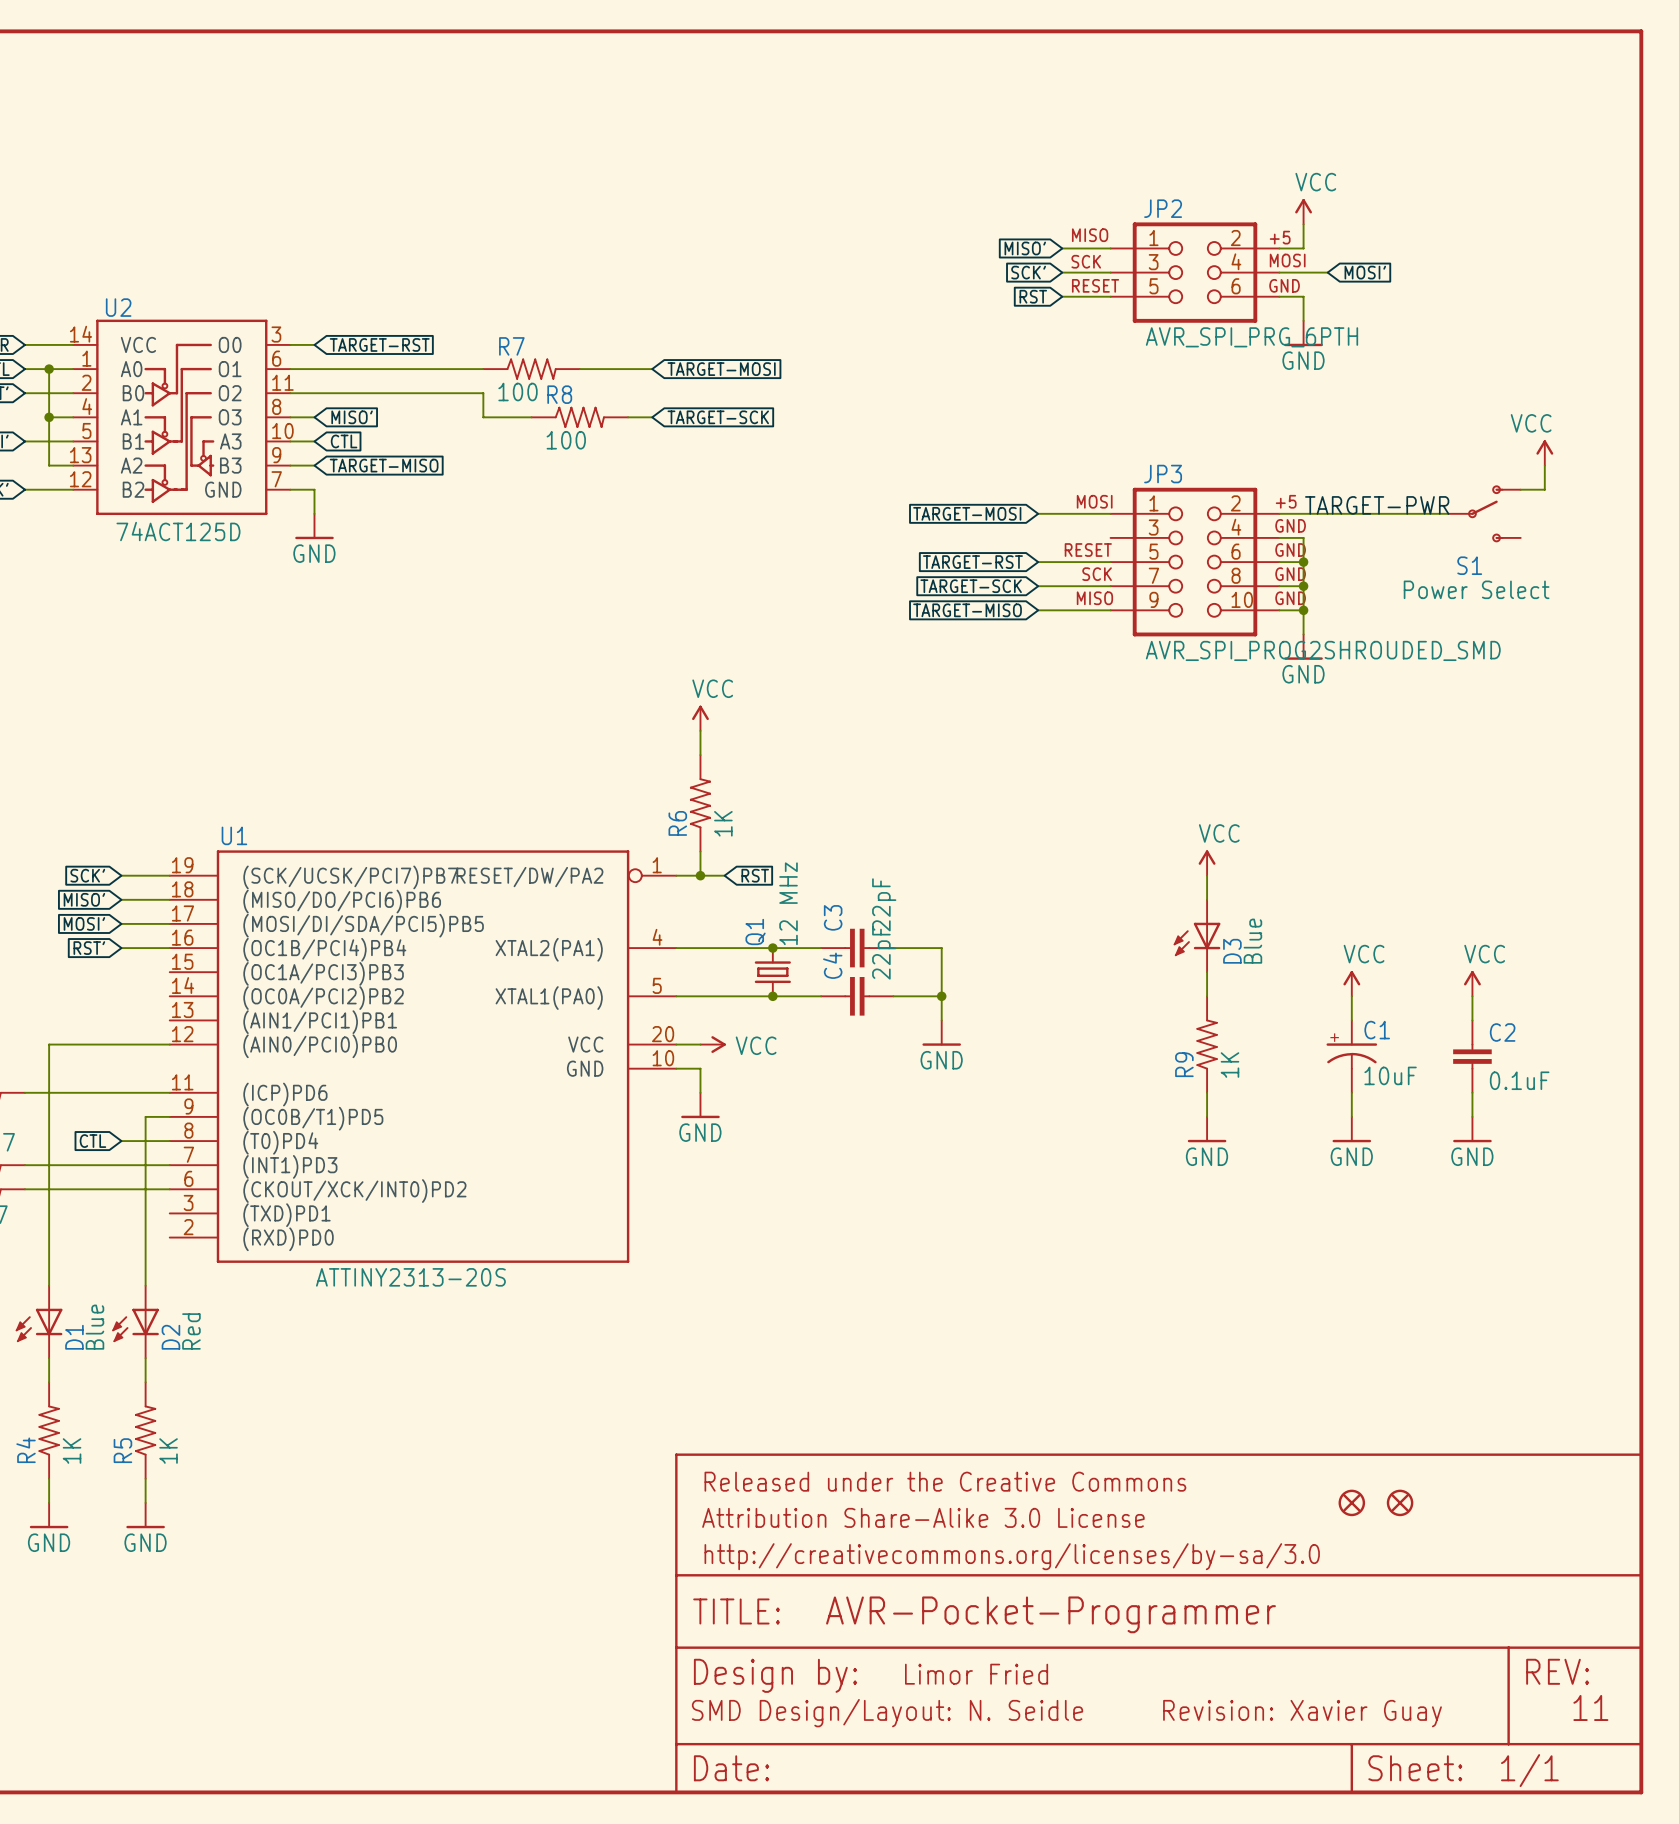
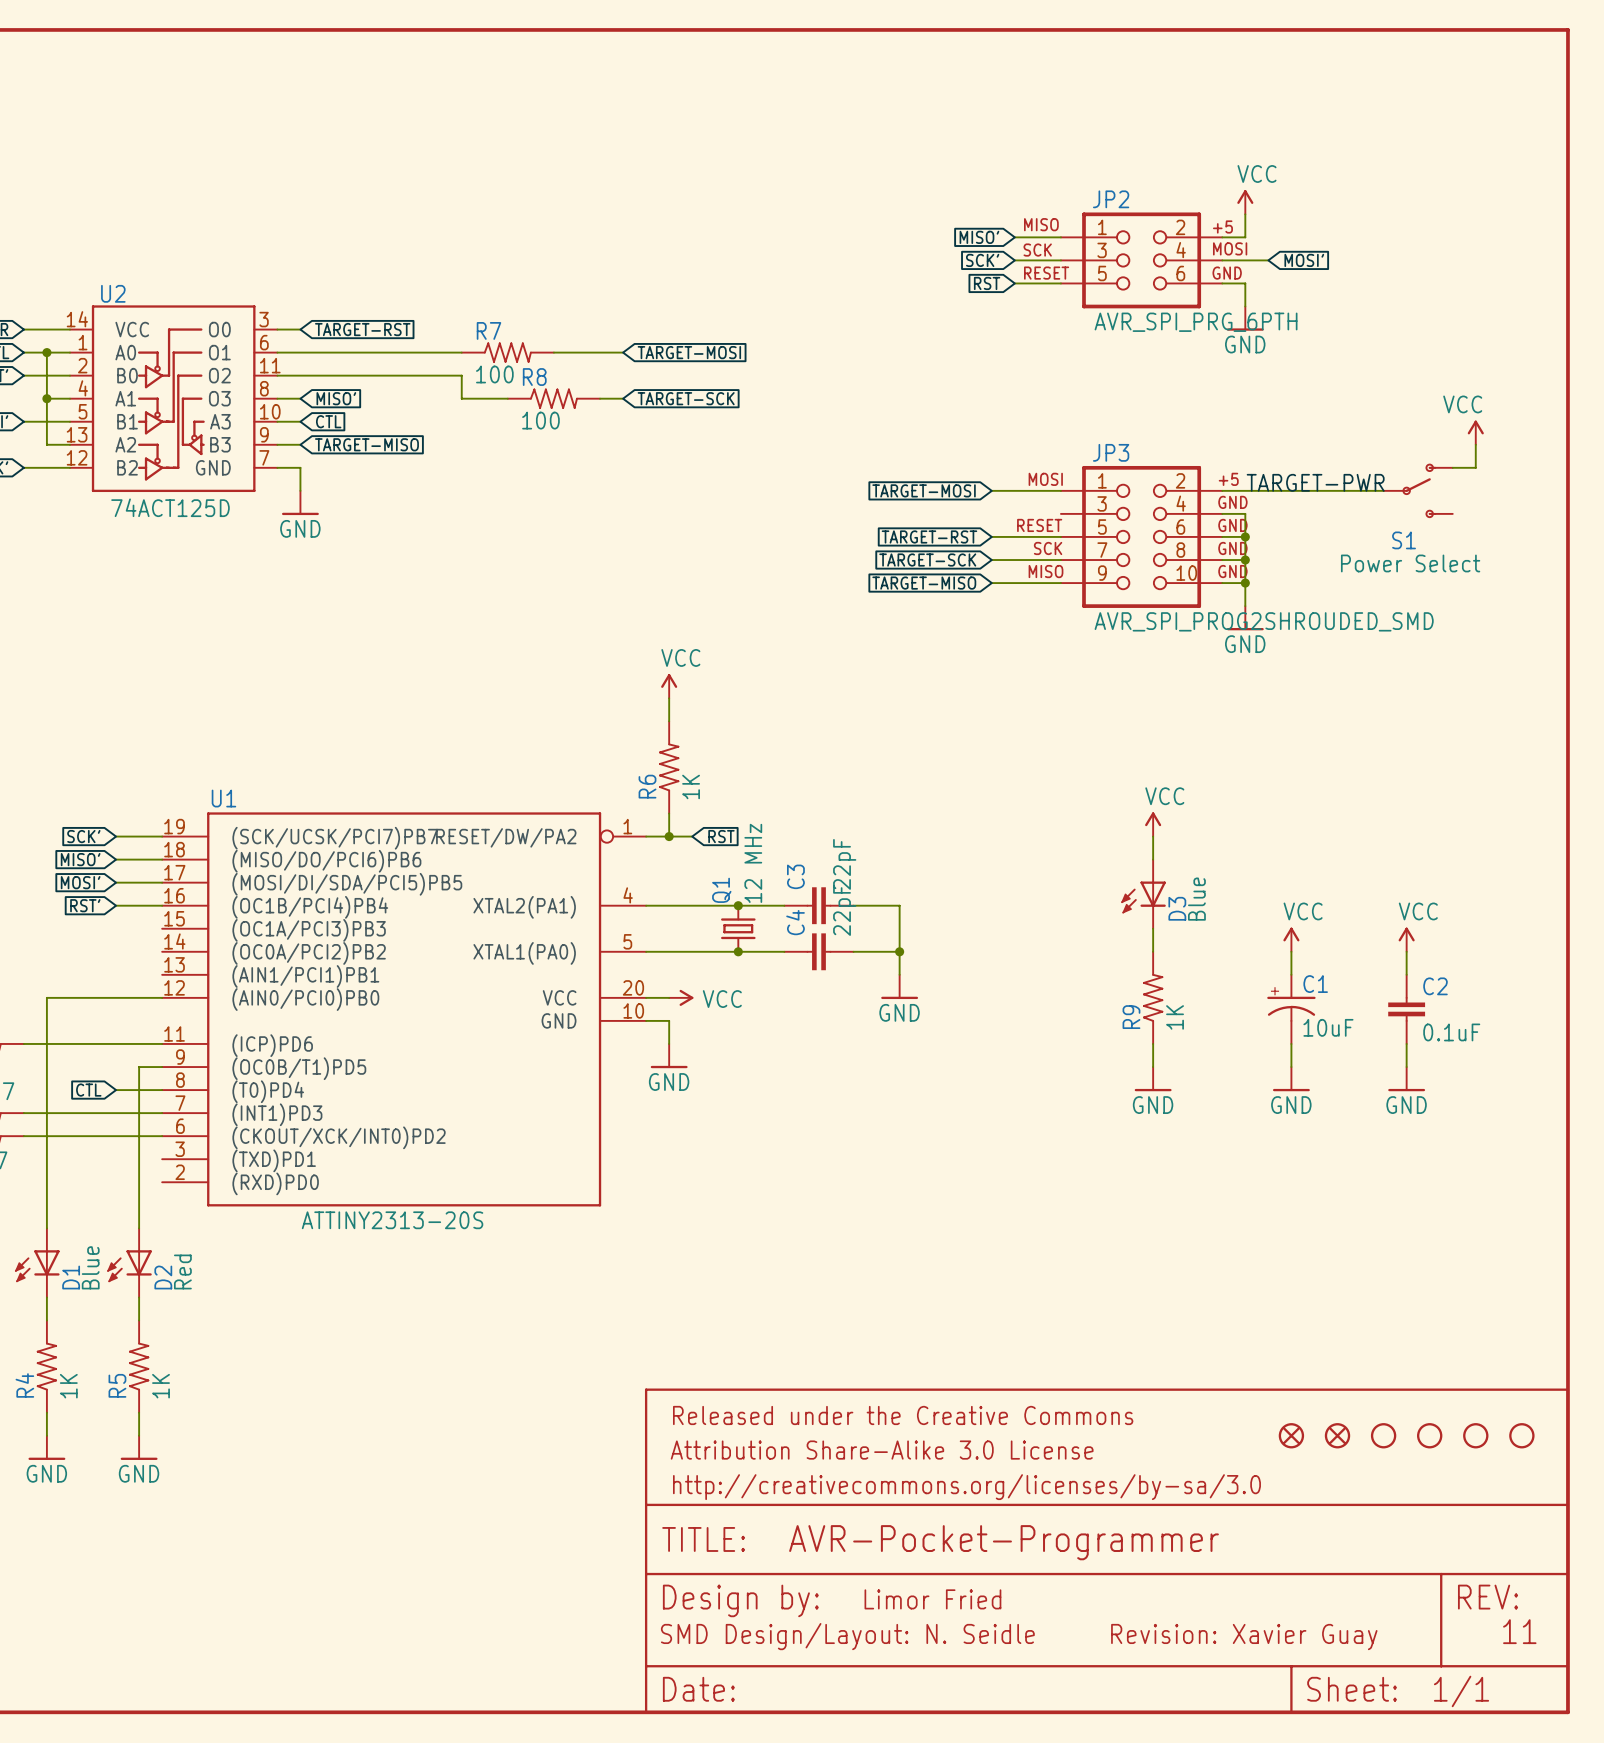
part: none -> (1383, 1435)
part: none -> (1429, 1435)
part: none -> (1475, 1435)
part: none -> (1521, 1435)

